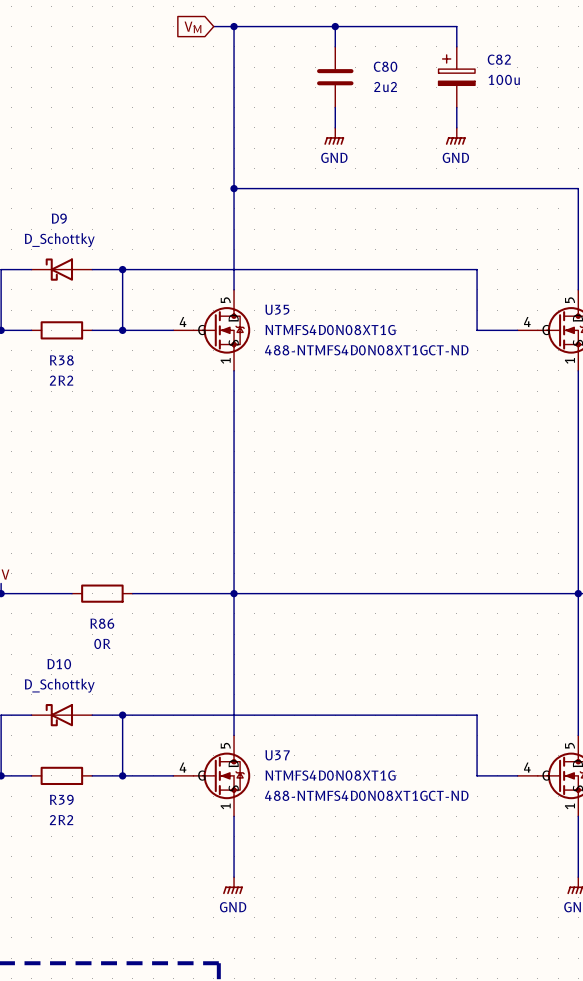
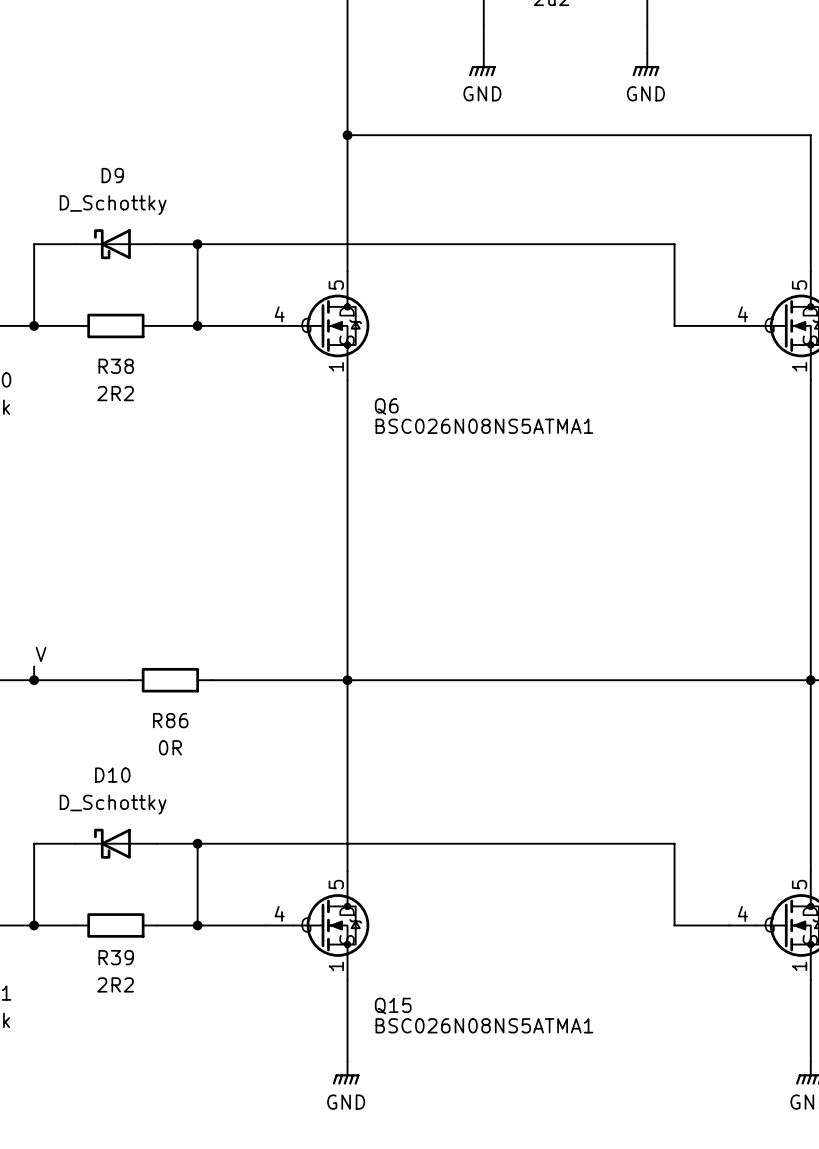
U35 name: U35 (277, 309) -> Q6 (386, 406)
U35 value: NTMFS4D0N08XT1G (330, 330) -> BSC026N08NS5ATMA1 (484, 426)
U35 text: 488-NTMFS4D0N08XT1GCT-ND (366, 350) -> none
U37 name: U37 (277, 755) -> Q15 (393, 1006)
U37 value: NTMFS4D0N08XT1G (330, 775) -> BSC026N08NS5ATMA1 (484, 1025)
U37 text: 488-NTMFS4D0N08XT1GCT-ND (366, 795) -> none

